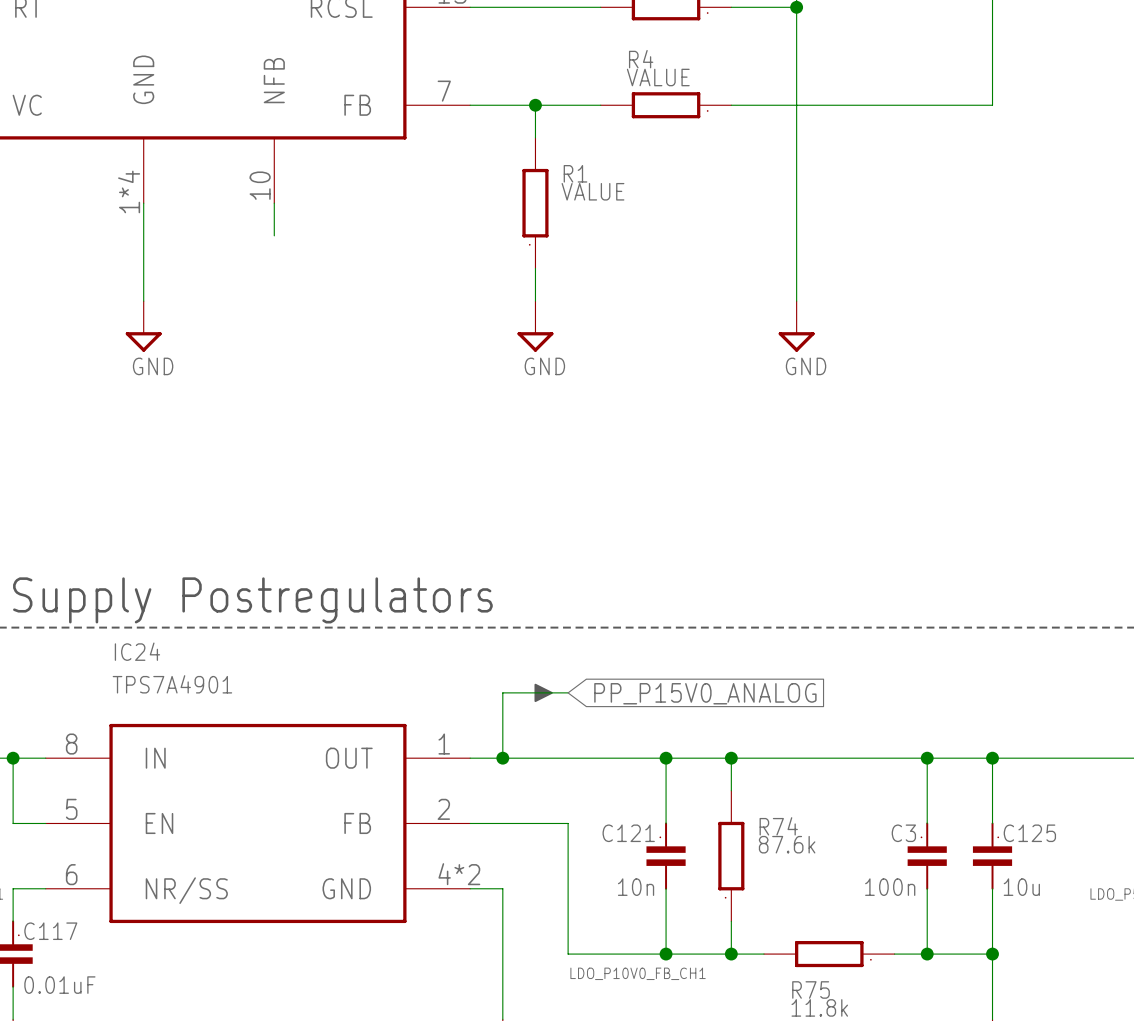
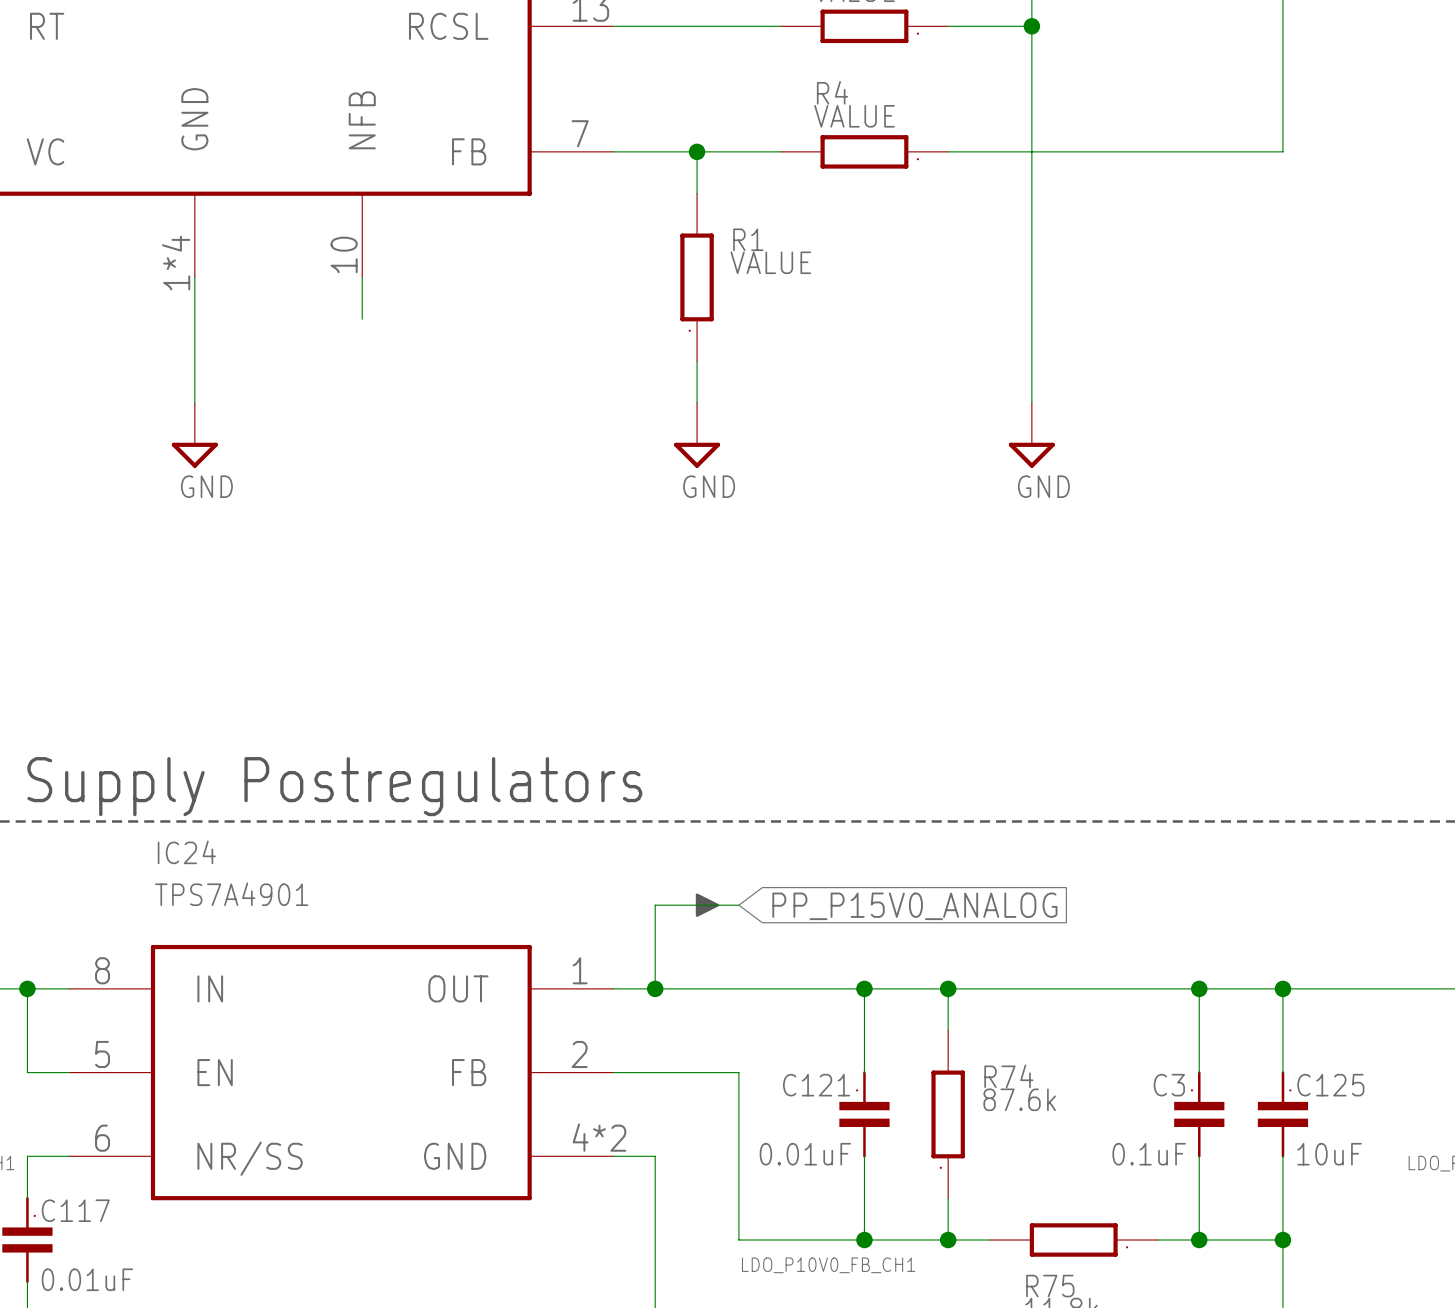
C121 value: 10n (636, 887) -> 0.01uF (805, 1154)
C3 value: 100n (890, 887) -> 0.1uF (1149, 1154)
C125 value: 10u (1021, 887) -> 10uF (1329, 1154)

